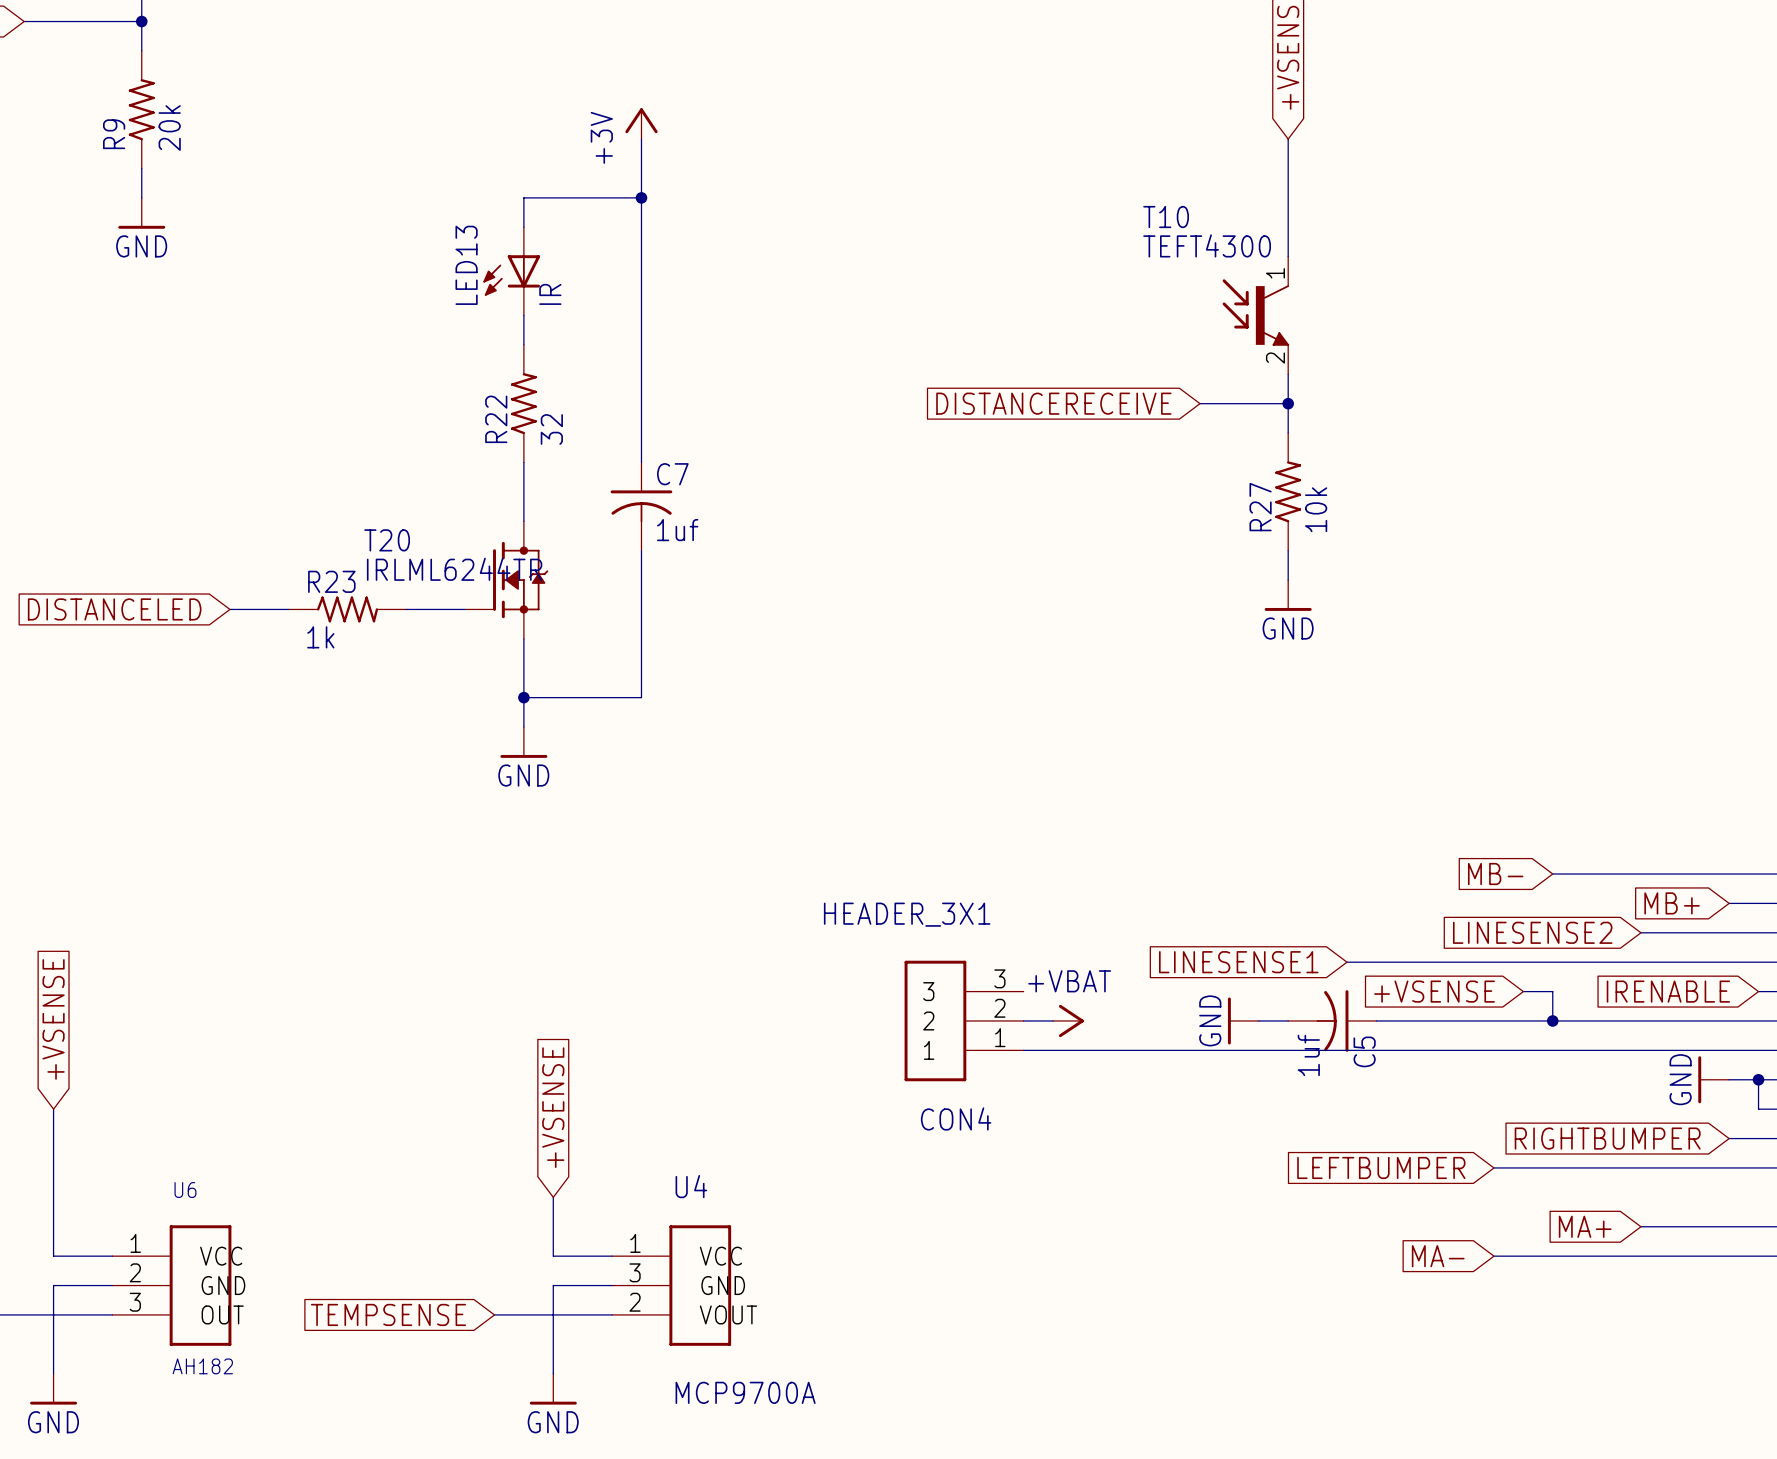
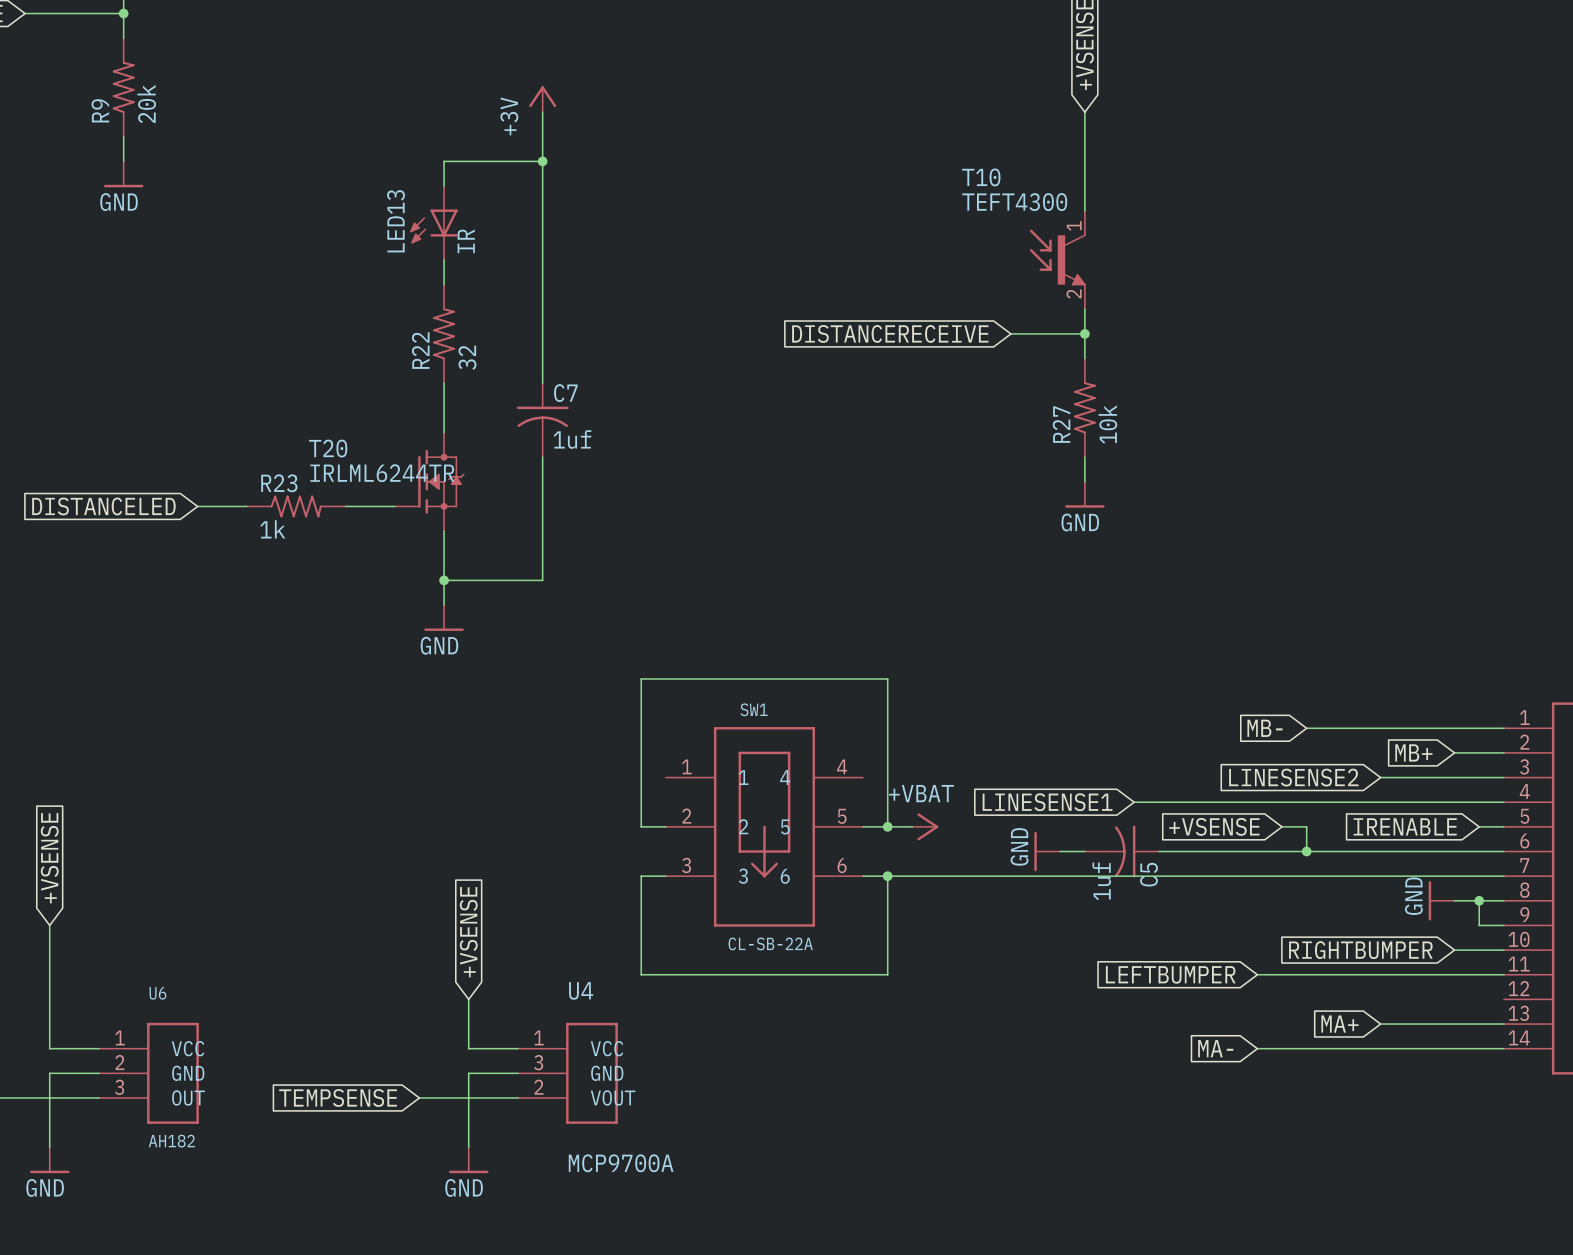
wire: none -> (665, 826) (641, 826) (641, 678) (887, 678) (887, 826)
SW1: none -> CL-SB-22A (764, 826)
wire: none -> (863, 826) (912, 826)
junction: none -> (887, 826)
CON4: HEADER_3X1 (964, 1020) -> none
wire: (1023, 1020) (1053, 1020) -> none
power symbol position: +VBAT (1068, 1020) -> +VBAT (925, 826)
wire: none -> (665, 876) (641, 876) (641, 974) (887, 974) (887, 876)
junction: none -> (887, 876)

